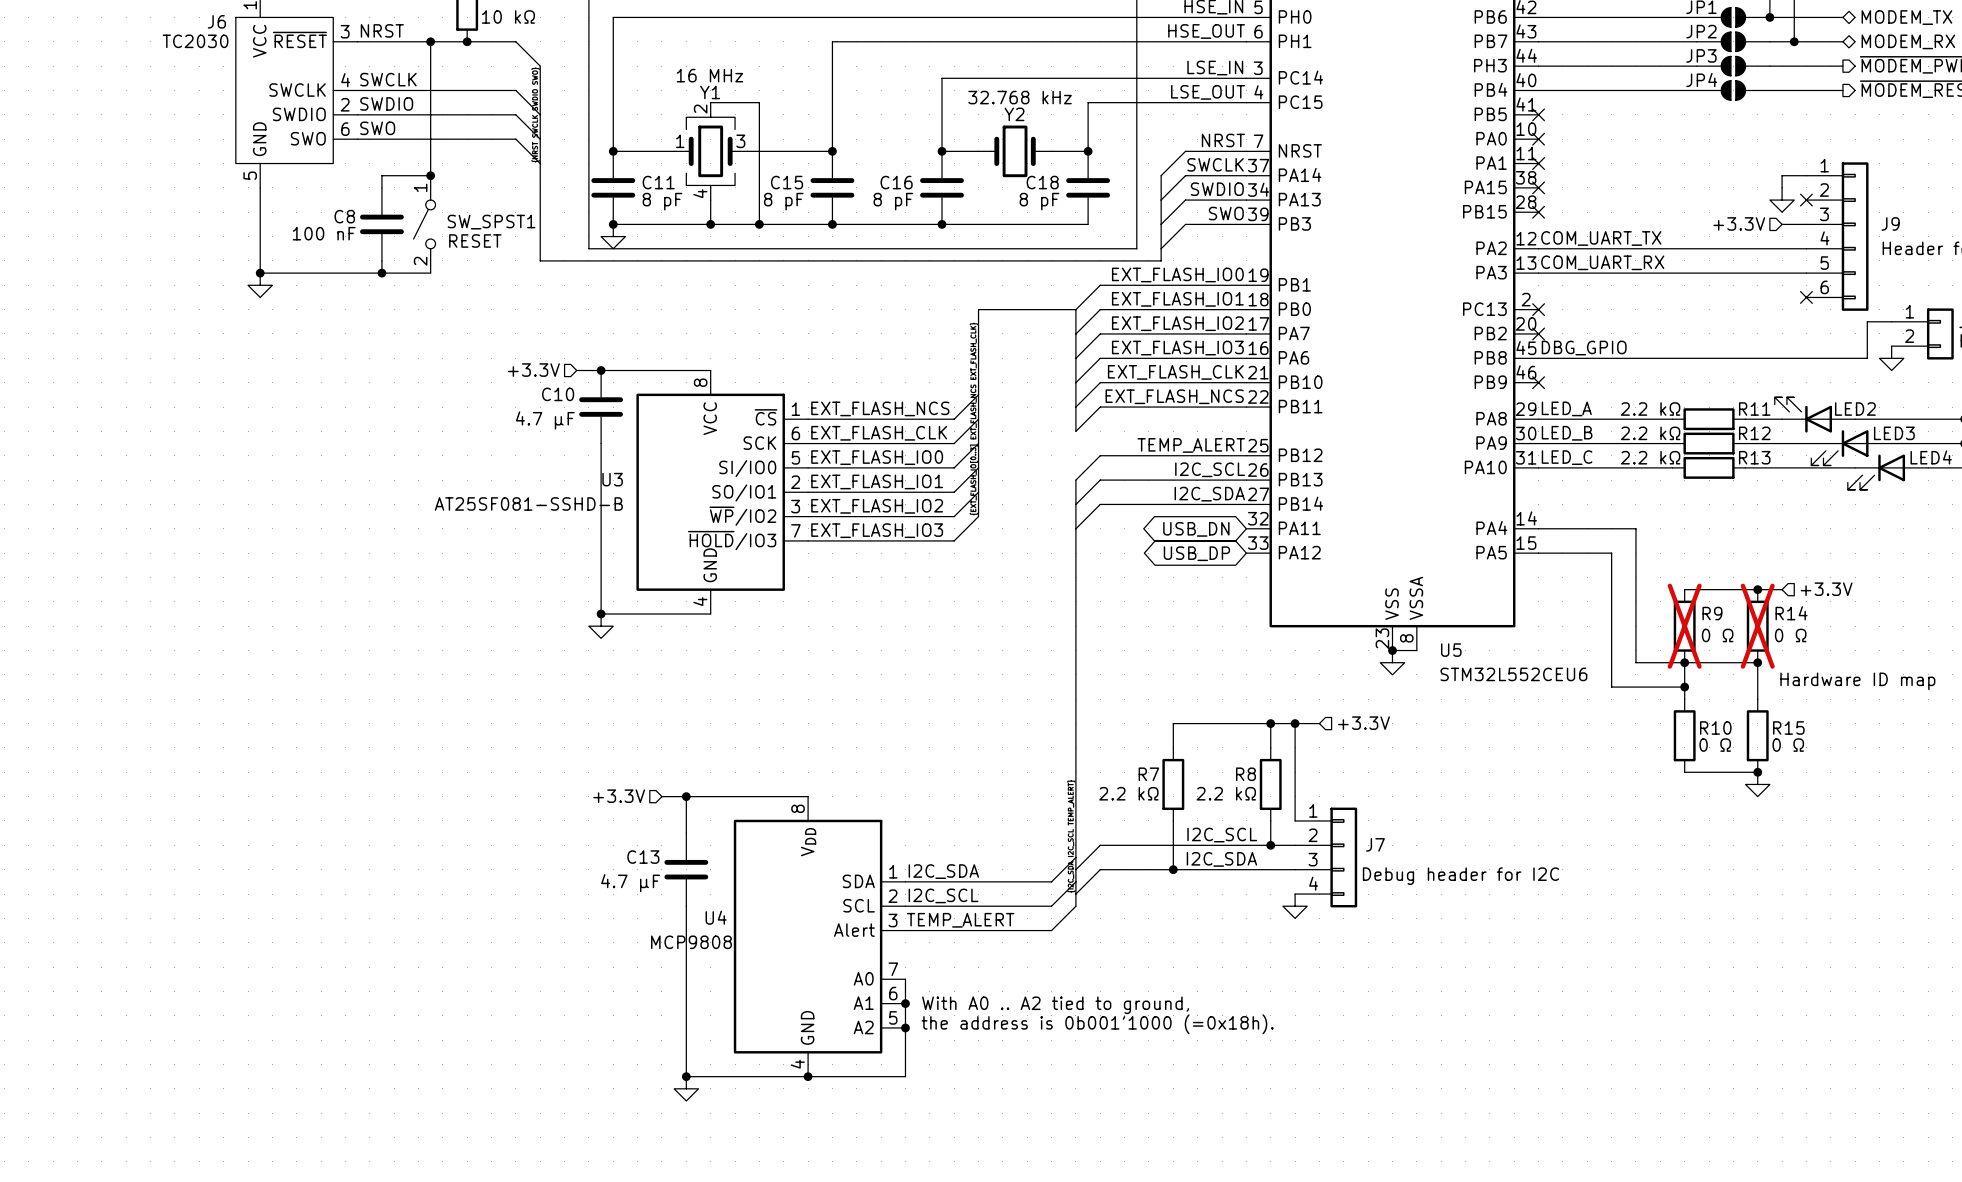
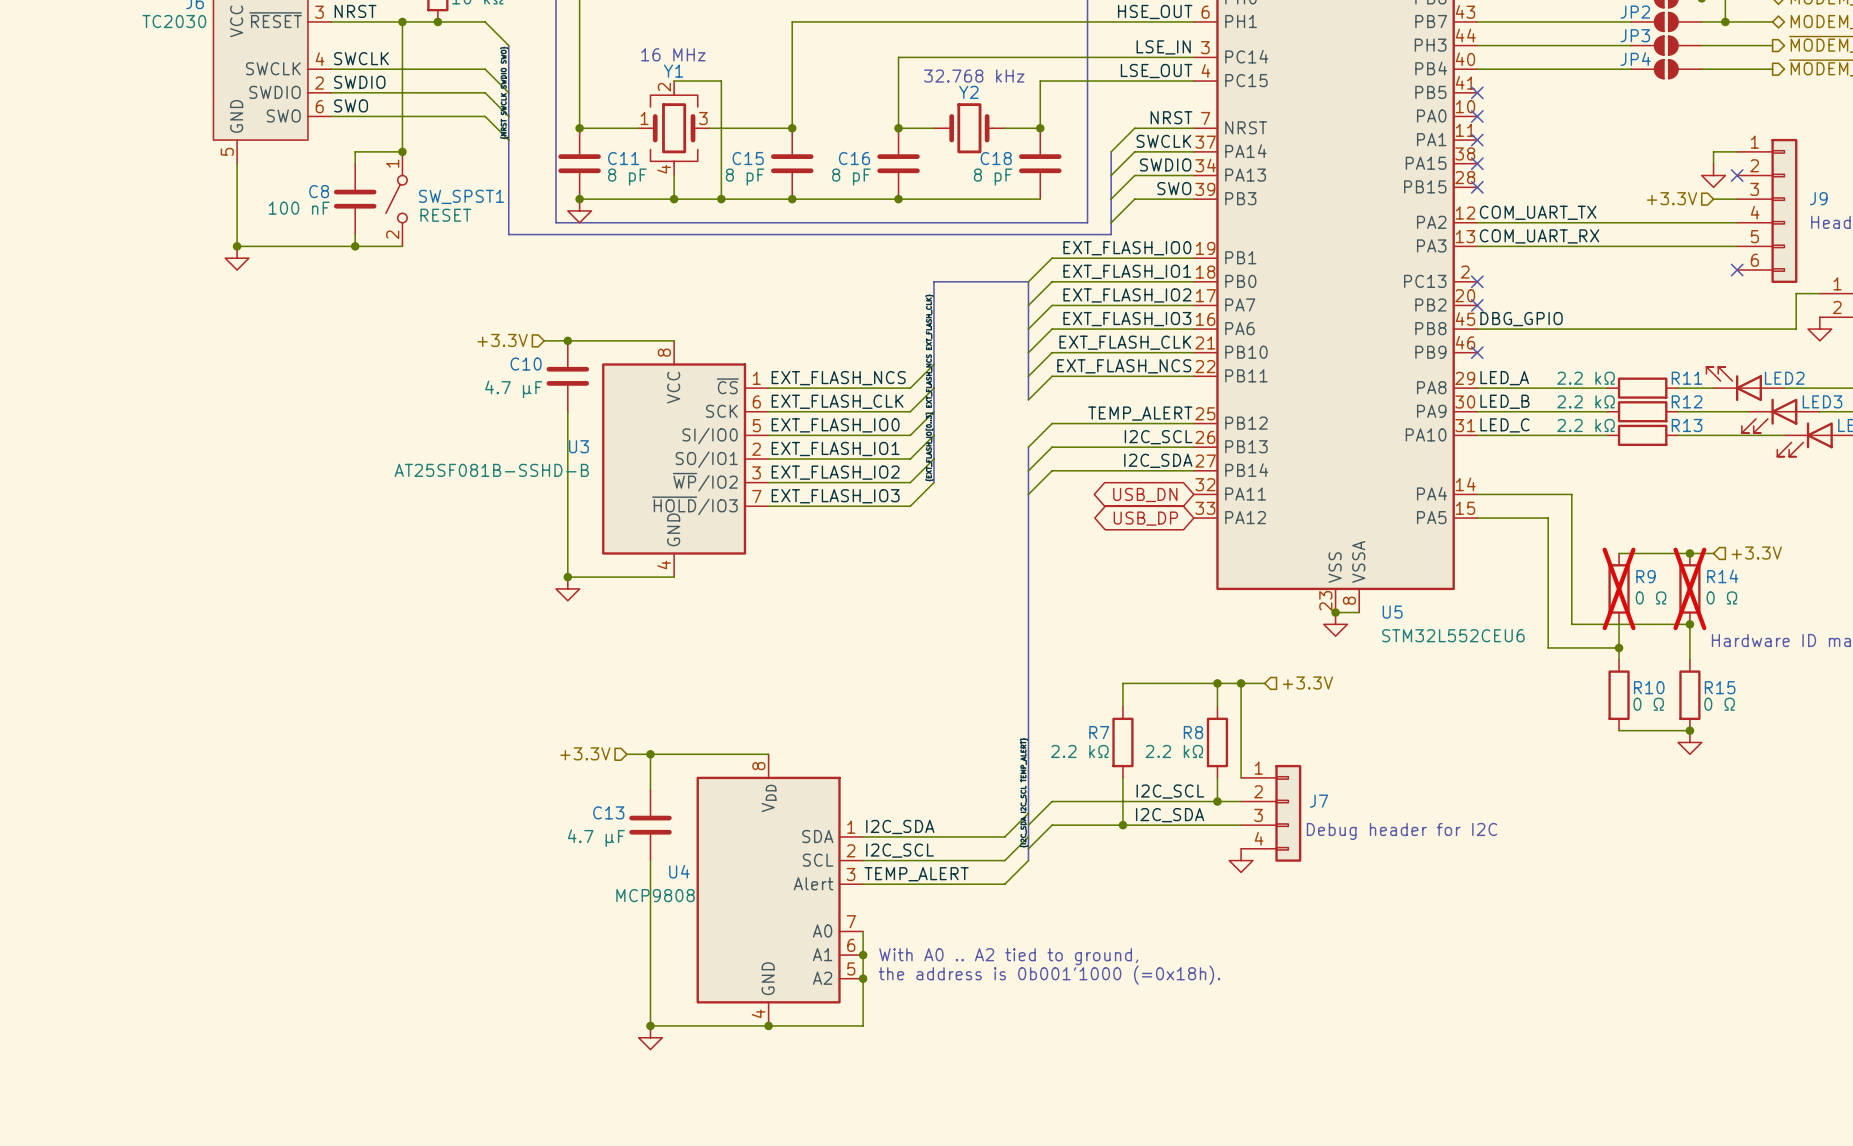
U3 value: AT25SF081-SSHD-B (528, 503) -> AT25SF081B-SSHD-B (491, 470)
junction: (1684, 662) -> none

